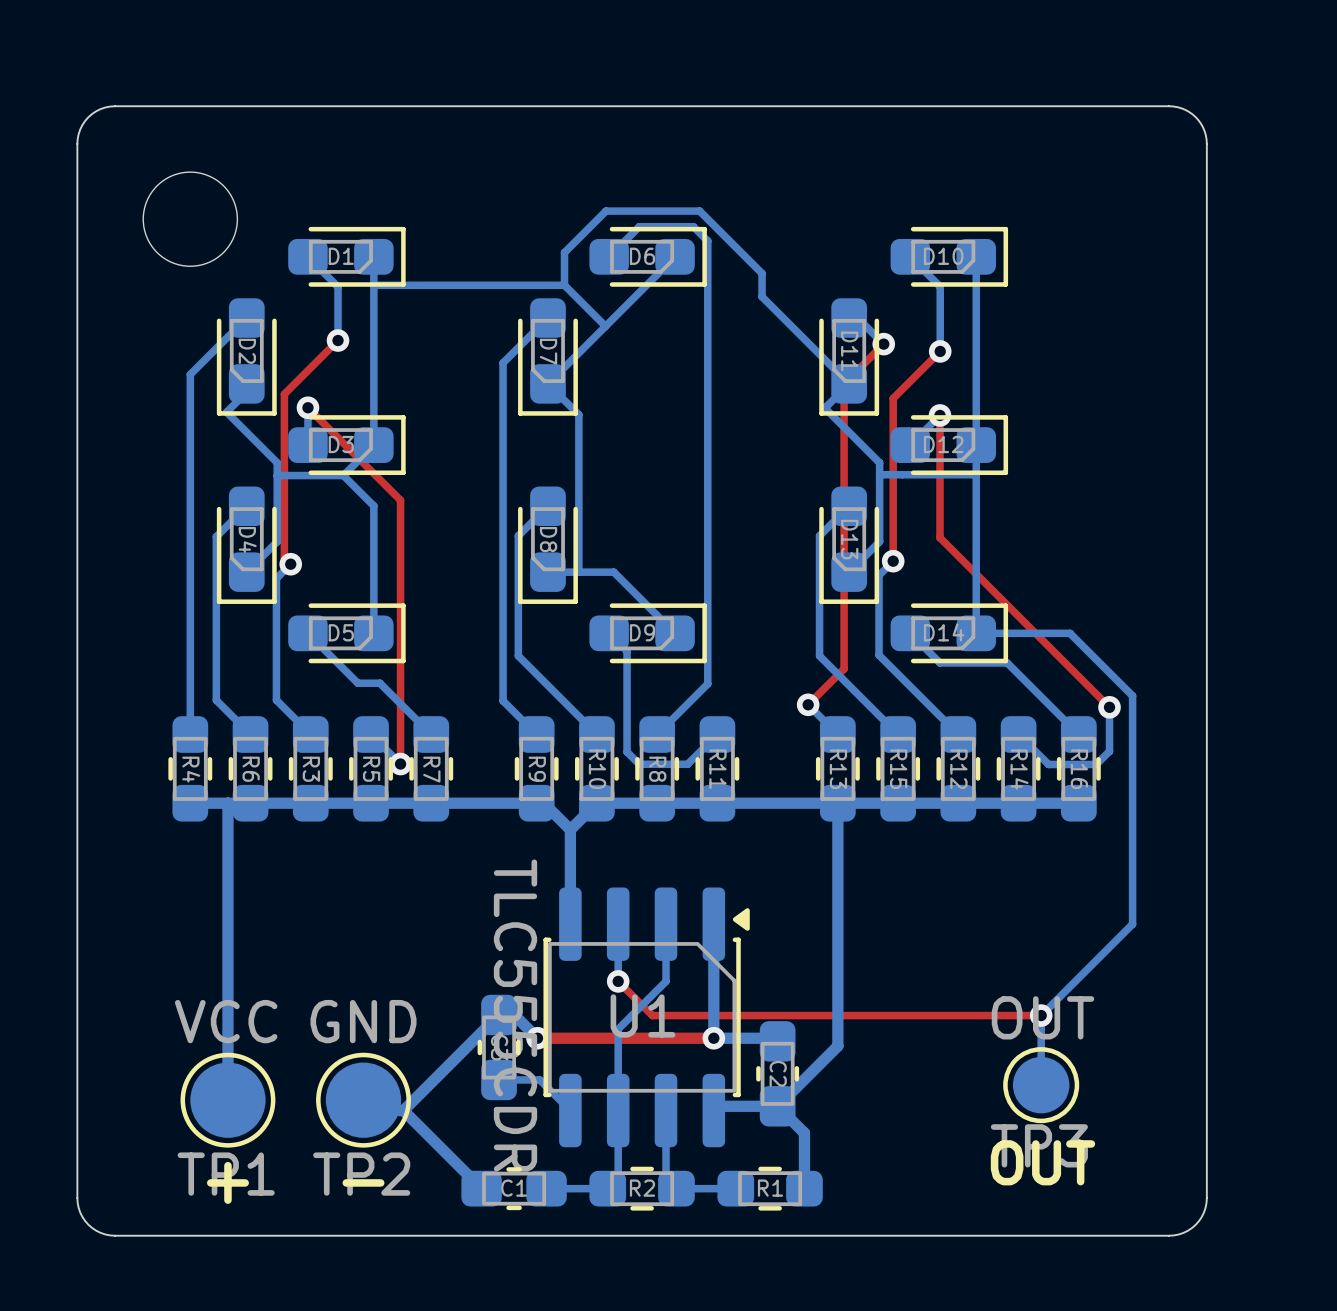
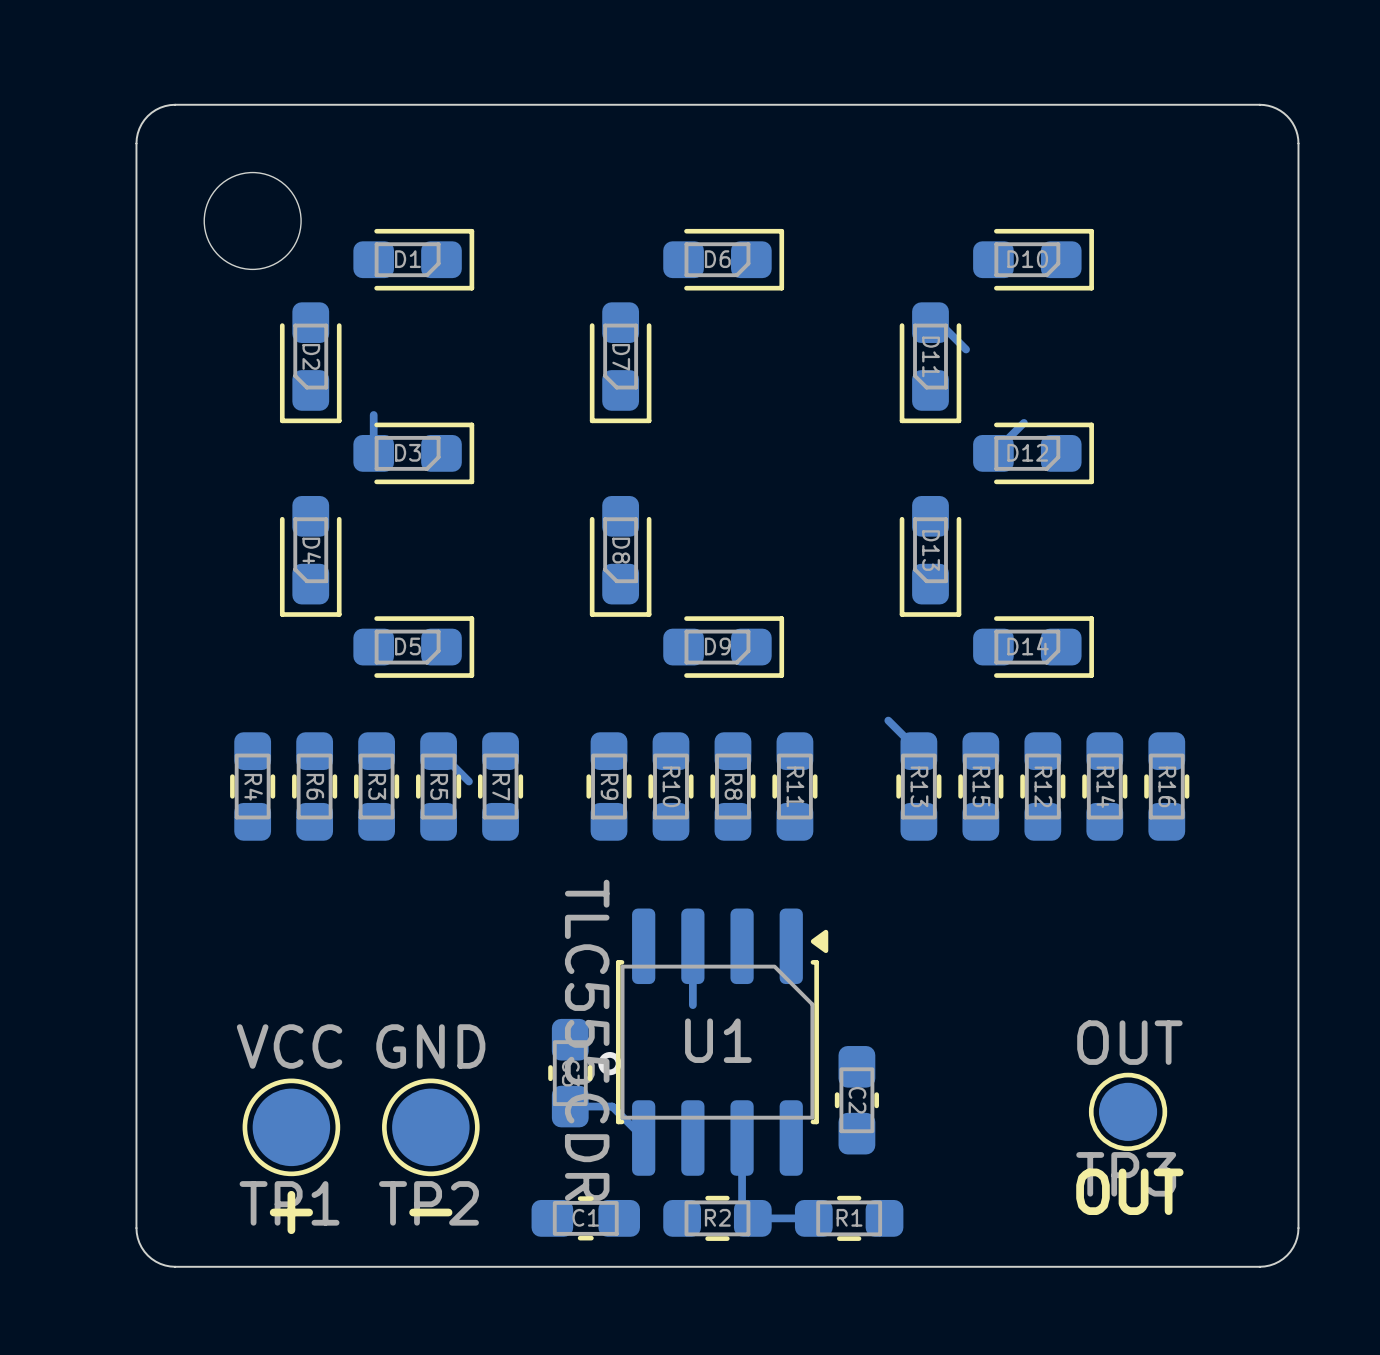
bottom track: (307, 256) (338, 286) (338, 340) -> none
bottom track: (373, 256) (373, 445) (343, 475) -> none
bottom track: (609, 256) (639, 226) (693, 226) (707, 241) (707, 683) (657, 734) -> none
bottom track: (675, 256) (547, 383) (578, 414) (578, 572) -> none
bottom track: (910, 256) (940, 286) (940, 351) -> none
bottom track: (976, 256) (976, 633) (1070, 633) (1132, 695) (1132, 924) (1041, 1015) (1041, 1085) -> none
bottom track: (564, 285) (373, 285) -> none
bottom track: (564, 285) (605, 326) -> none
bottom track: (564, 285) (564, 252) (606, 211) (699, 211) (762, 273) (762, 296) (849, 383) (826, 406) (826, 409) (879, 462) (879, 541) (849, 572) -> none
bottom track: (246, 318) (190, 374) (190, 734) -> none
bottom track: (547, 318) (503, 362) (503, 700) (536, 734) -> none
top track: (338, 340) (284, 394) (284, 557) (290, 564) -> none
via: (338, 340) -> none
top track: (883, 344) (844, 383) (844, 668) (808, 704) -> none
via: (883, 344) -> none
top track: (940, 351) (893, 398) (893, 561) -> none
via: (940, 351) -> none
bottom track: (246, 383) (246, 392) (226, 412) (277, 462) (277, 541) (246, 572) -> none
top track: (307, 407) (400, 500) (400, 764) -> none
via: (307, 407) -> none
top track: (939, 415) (939, 537) (1109, 707) -> none
via: (939, 415) -> none
bottom track: (976, 474) (879, 474) -> none
bottom track: (343, 475) (373, 506) (373, 633) -> none
bottom track: (343, 475) (277, 475) -> none
bottom track: (246, 506) (216, 536) (216, 700) (250, 734) -> none
bottom track: (547, 506) (518, 535) (518, 655) (596, 734) -> none
bottom track: (849, 506) (819, 535) (819, 655) (898, 734) -> none
bottom track: (893, 561) (879, 575) (879, 655) (958, 734) -> none
via: (893, 561) -> none
bottom track: (290, 564) (276, 578) (276, 700) (310, 734) -> none
via: (290, 564) -> none
bottom track: (547, 572) (613, 572) (675, 633) -> none
bottom track: (307, 633) (357, 683) (379, 683) (431, 734) -> none
bottom track: (609, 633) (627, 651) (627, 752) (639, 764) (687, 764) (717, 734) -> none
bottom track: (910, 633) (939, 662) (1007, 662) (1078, 734) -> none
via: (808, 704) -> none
bottom track: (1109, 707) (1109, 751) (1096, 764) (1048, 764) (1018, 734) -> none
via: (1109, 707) -> none
via: (400, 764) -> none
bottom track: (190, 803) (543, 803) (570, 829) -> none
bottom track: (227, 803) (227, 1100) -> none
bottom track: (837, 803) (837, 1046) (777, 1106) -> none
bottom track: (1078, 803) (596, 803) (570, 829) -> none
bottom track: (570, 829) (570, 924) -> none
bottom track: (666, 924) (666, 981) (618, 1029) (618, 1178) (607, 1188) (546, 1188) -> none
bottom track: (713, 924) (713, 1038) (774, 1038) (777, 1041) -> none
top track: (618, 981) (652, 1015) (1041, 1015) -> none
via: (618, 981) -> none
via: (1041, 1015) -> none
bottom track: (537, 1038) (514, 1015) (499, 1015) (403, 1110) -> none
top track: (713, 1038) (537, 1038) -> none
via: (713, 1038) -> none
bottom track: (777, 1106) (718, 1106) (713, 1110) -> none
bottom track: (777, 1106) (804, 1133) (804, 1188) -> none
bottom track: (403, 1110) (481, 1188) -> none

